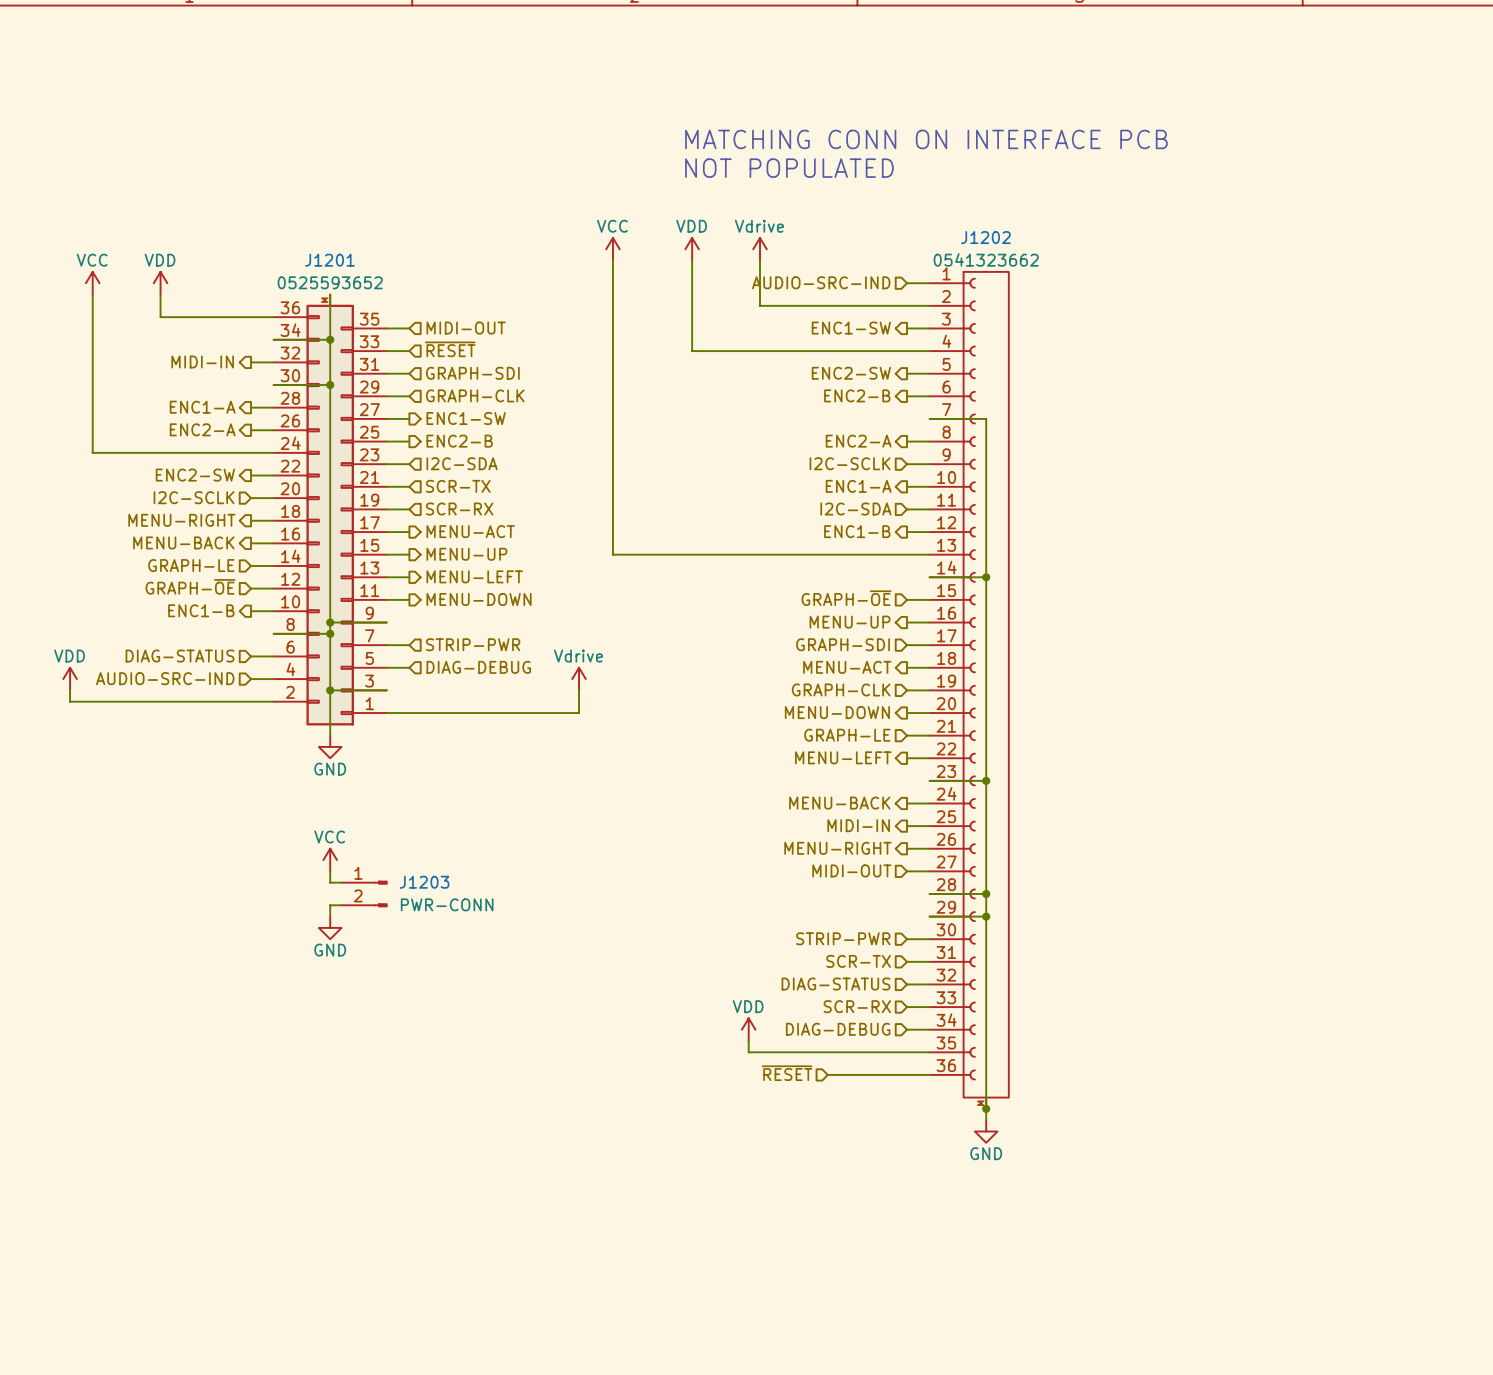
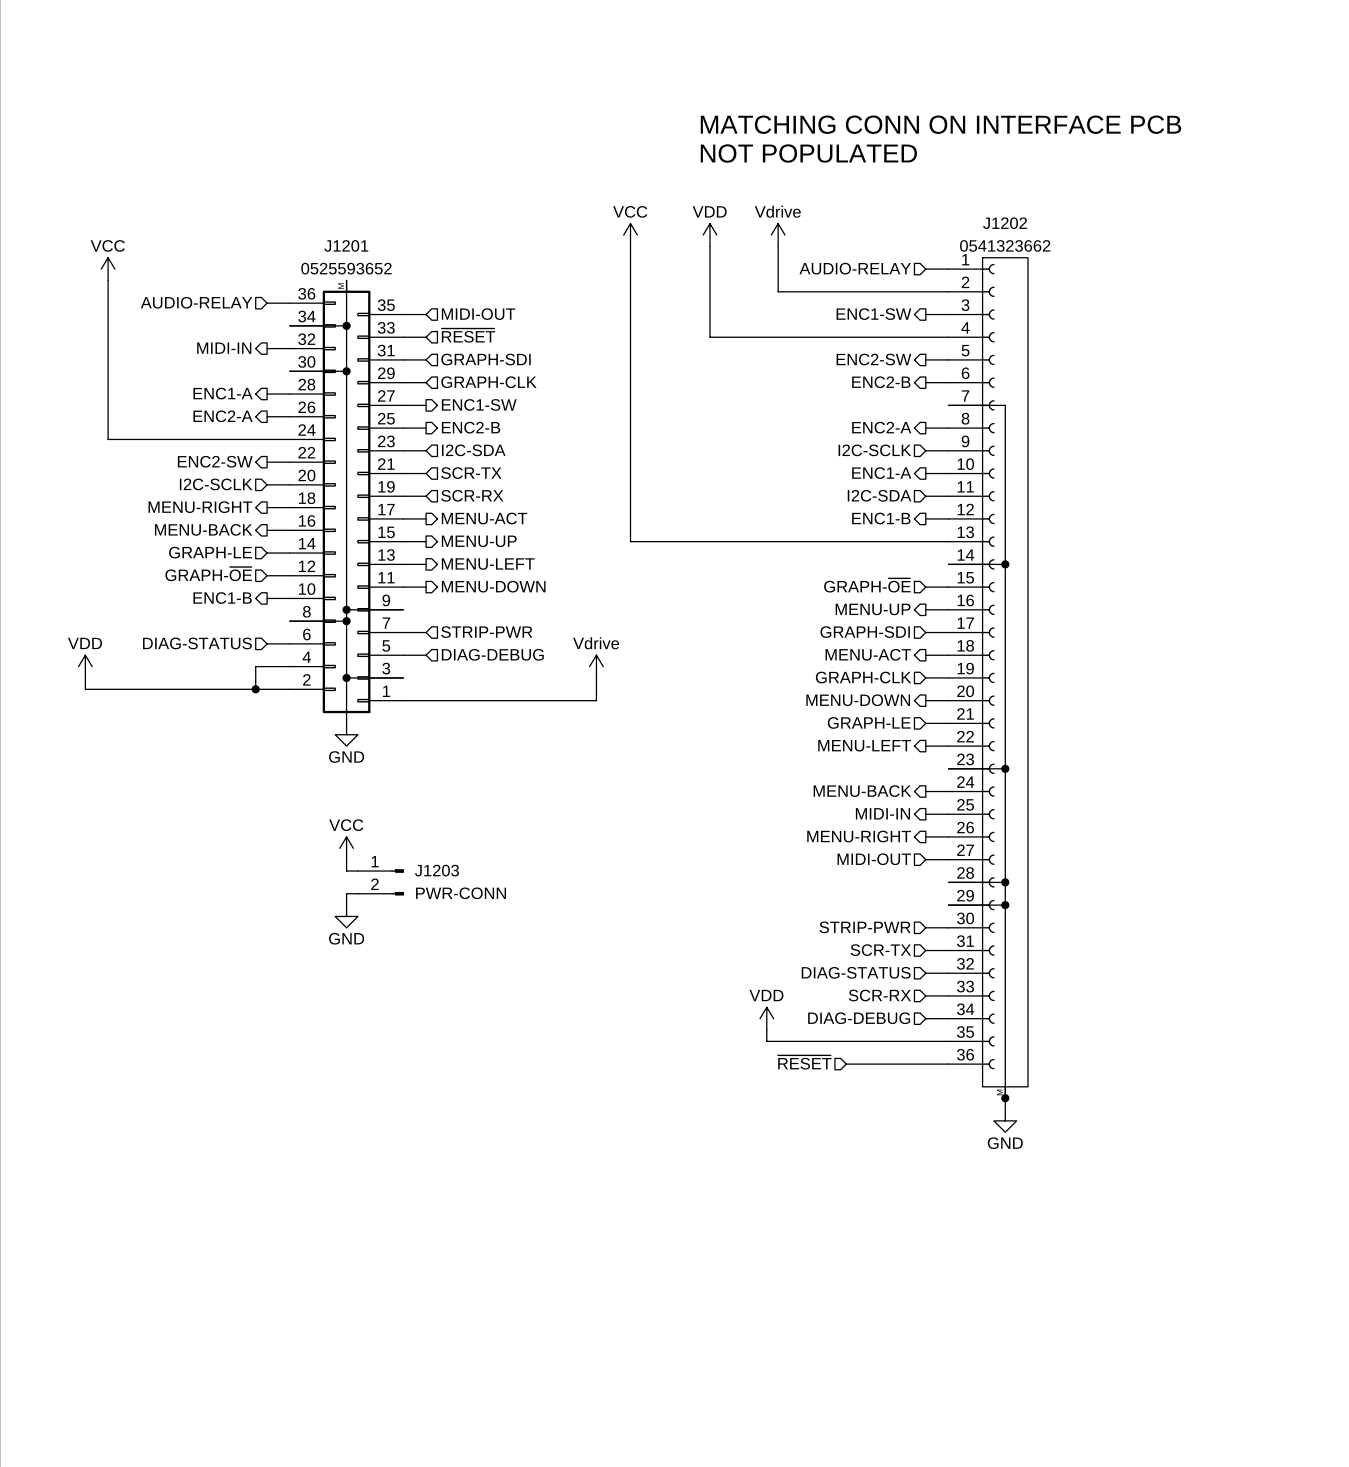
hierarchical label: AUDIO-SRC-IND (821, 282) -> AUDIO-RELAY (855, 268)
power symbol: VDD (160, 283) -> none
wire: (160, 294) (160, 317) (251, 317) -> none
hierarchical label: none -> AUDIO-RELAY (196, 302)
hierarchical label: AUDIO-SRC-IND (165, 678) -> none
wire: none -> (267, 666) (255, 666) (255, 689)
junction: none -> (255, 689)

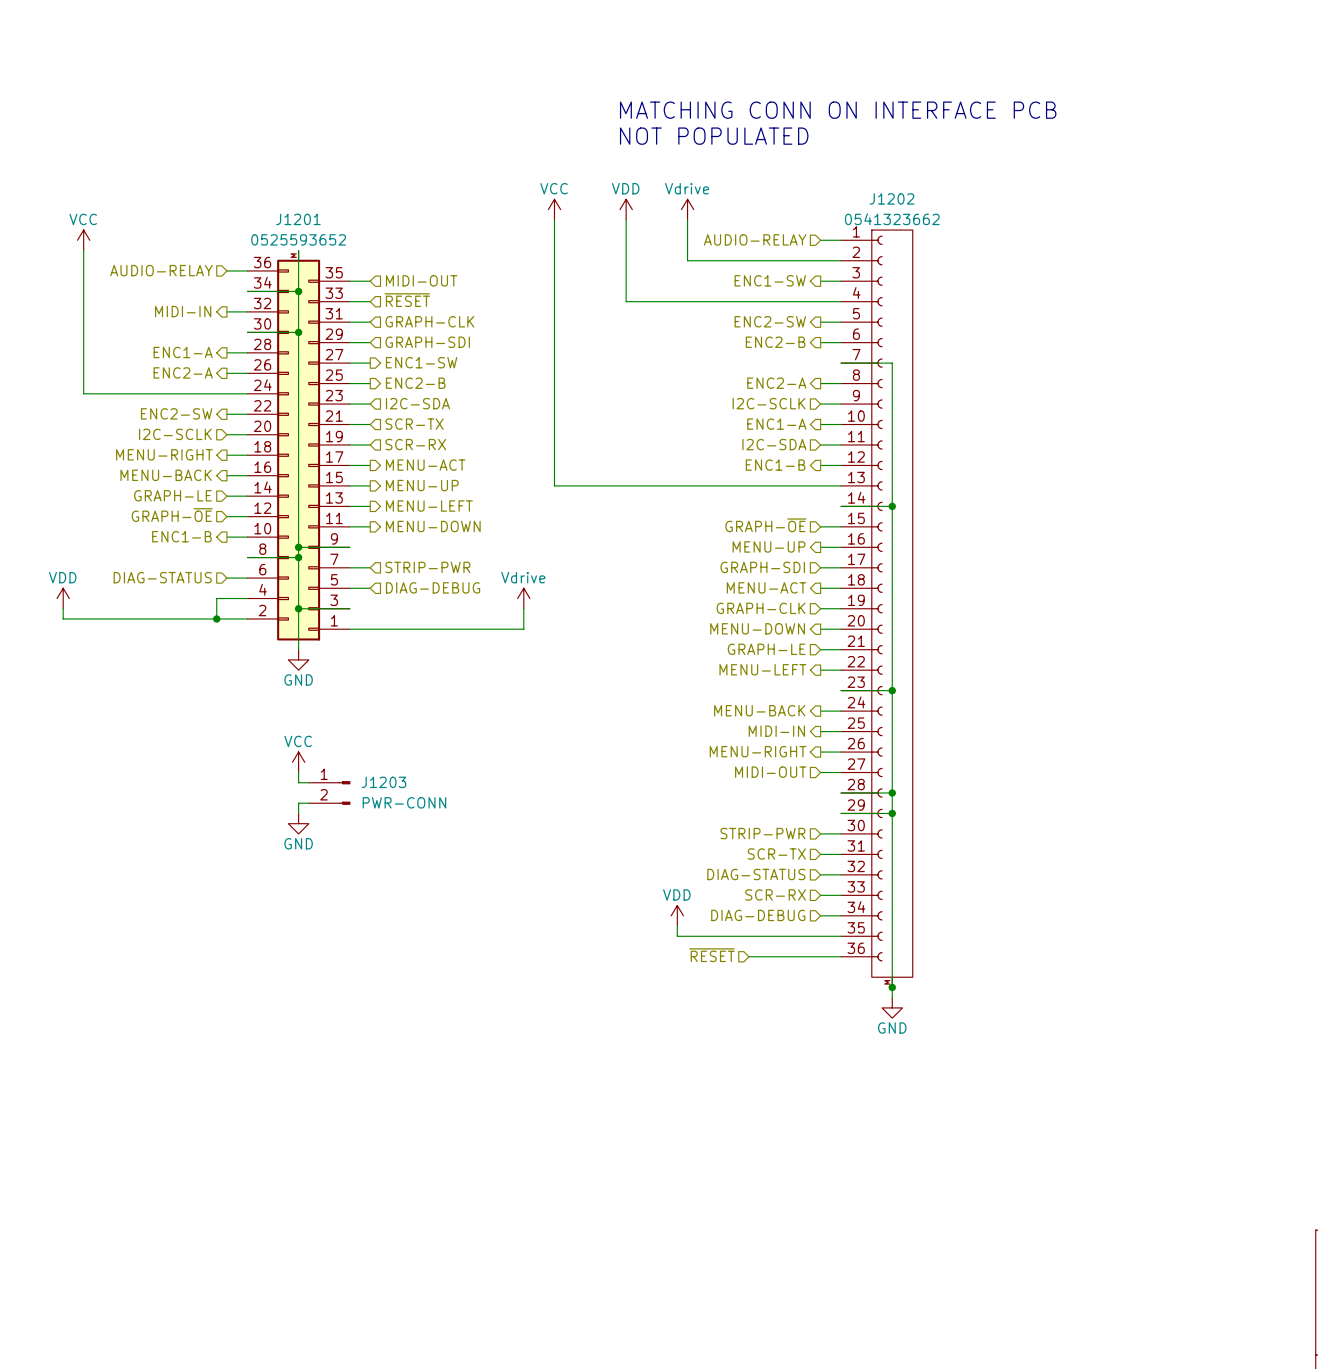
hierarchical label: GRAPH-SDI (486, 359) -> GRAPH-CLK (429, 321)
hierarchical label: GRAPH-CLK (488, 382) -> GRAPH-SDI (427, 342)

